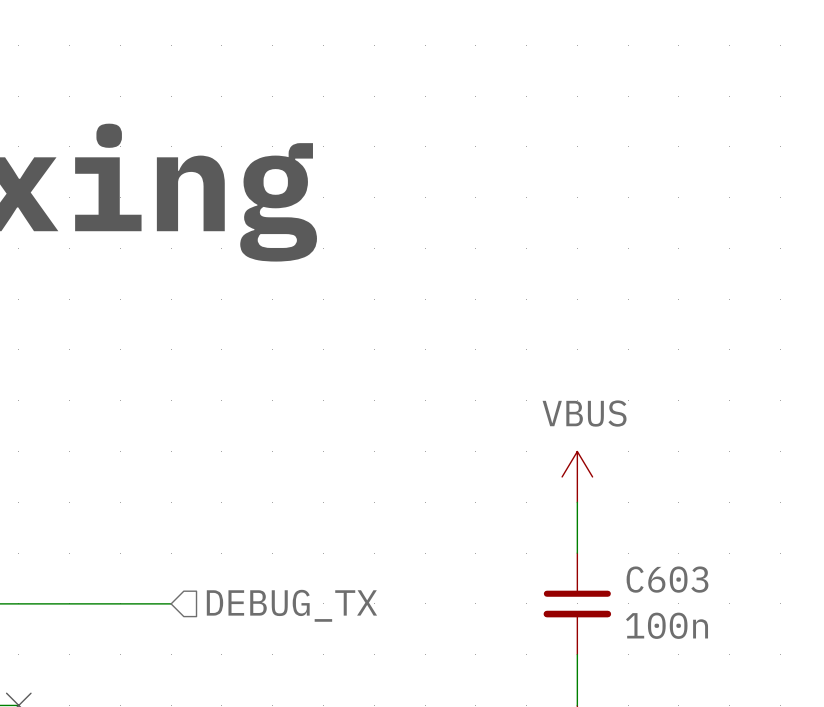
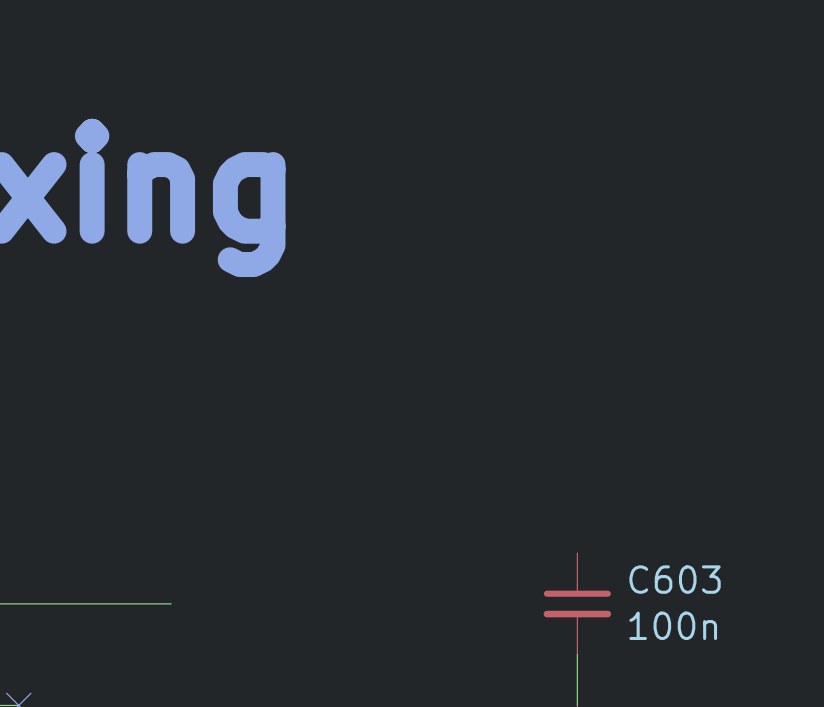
power symbol: VBUS (577, 476) -> none
wire: (577, 502) (577, 553) -> none
hierarchical label: DEBUG_TX (291, 605) -> none

